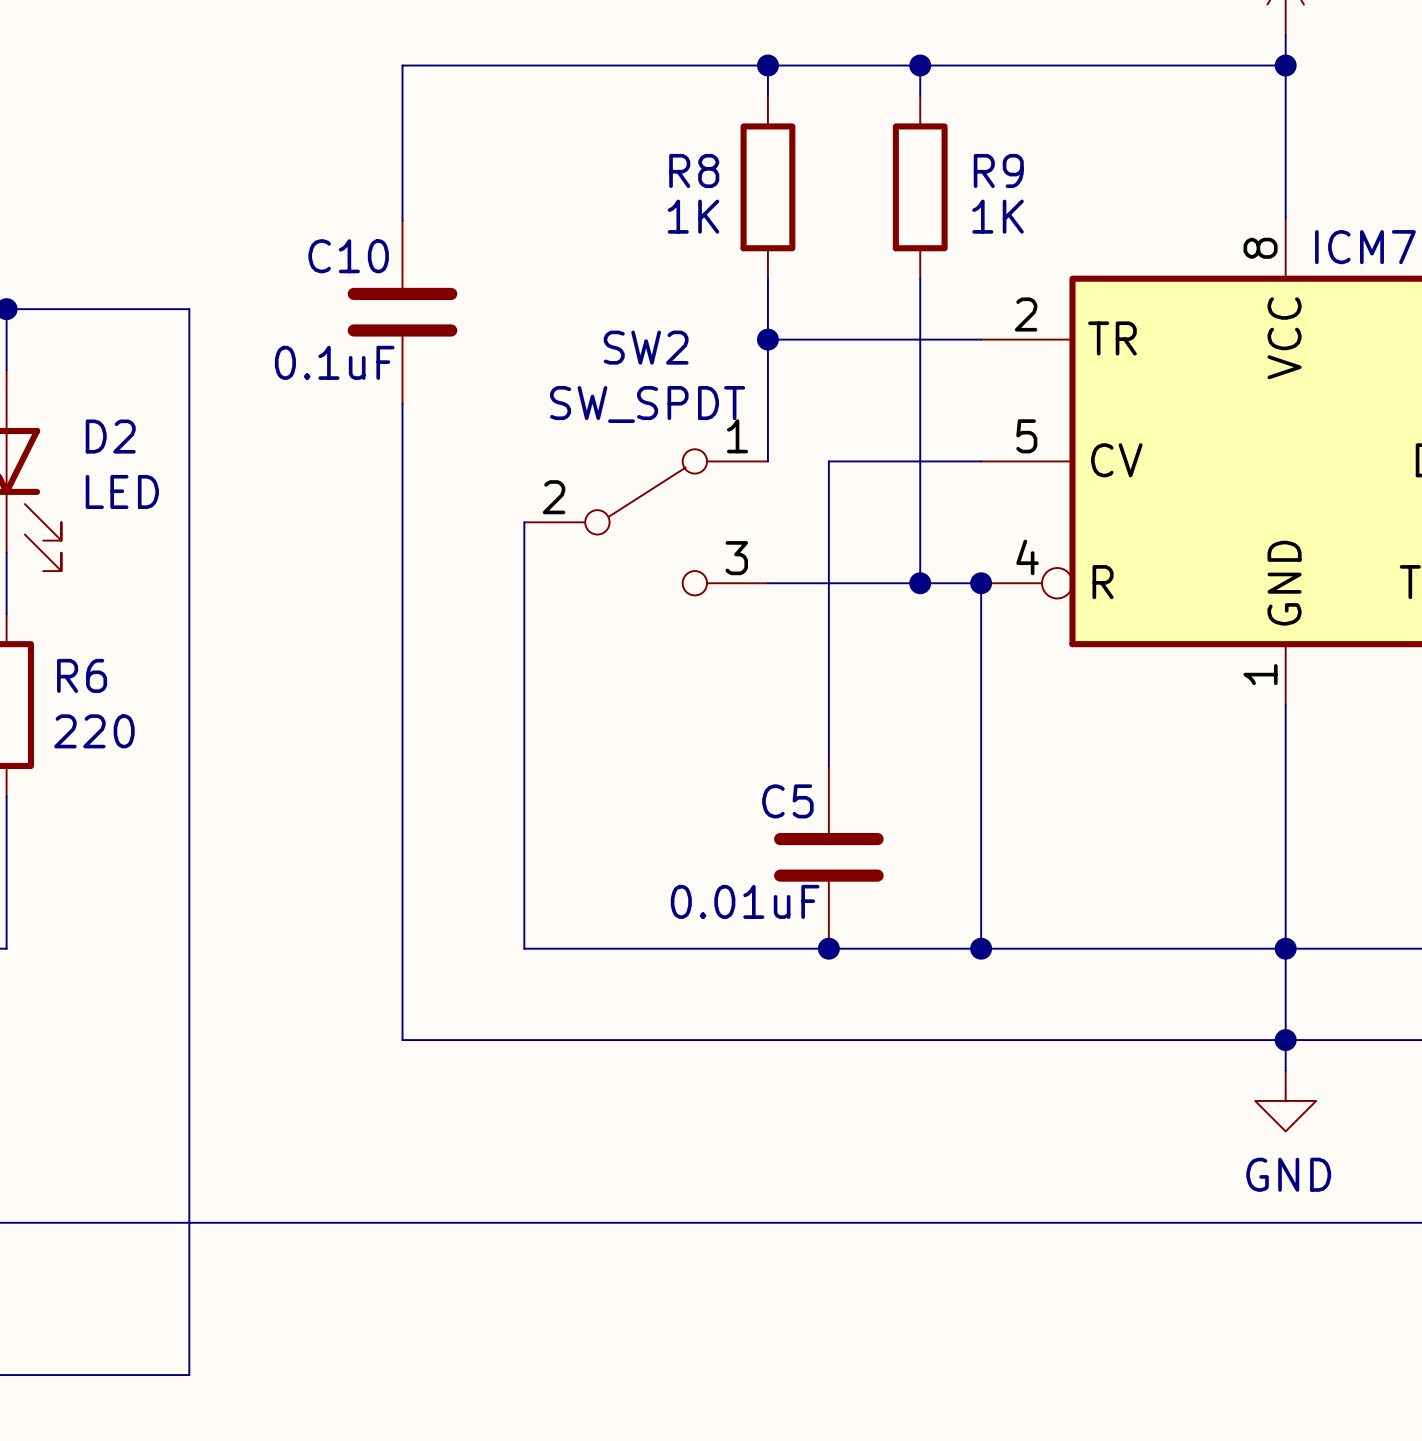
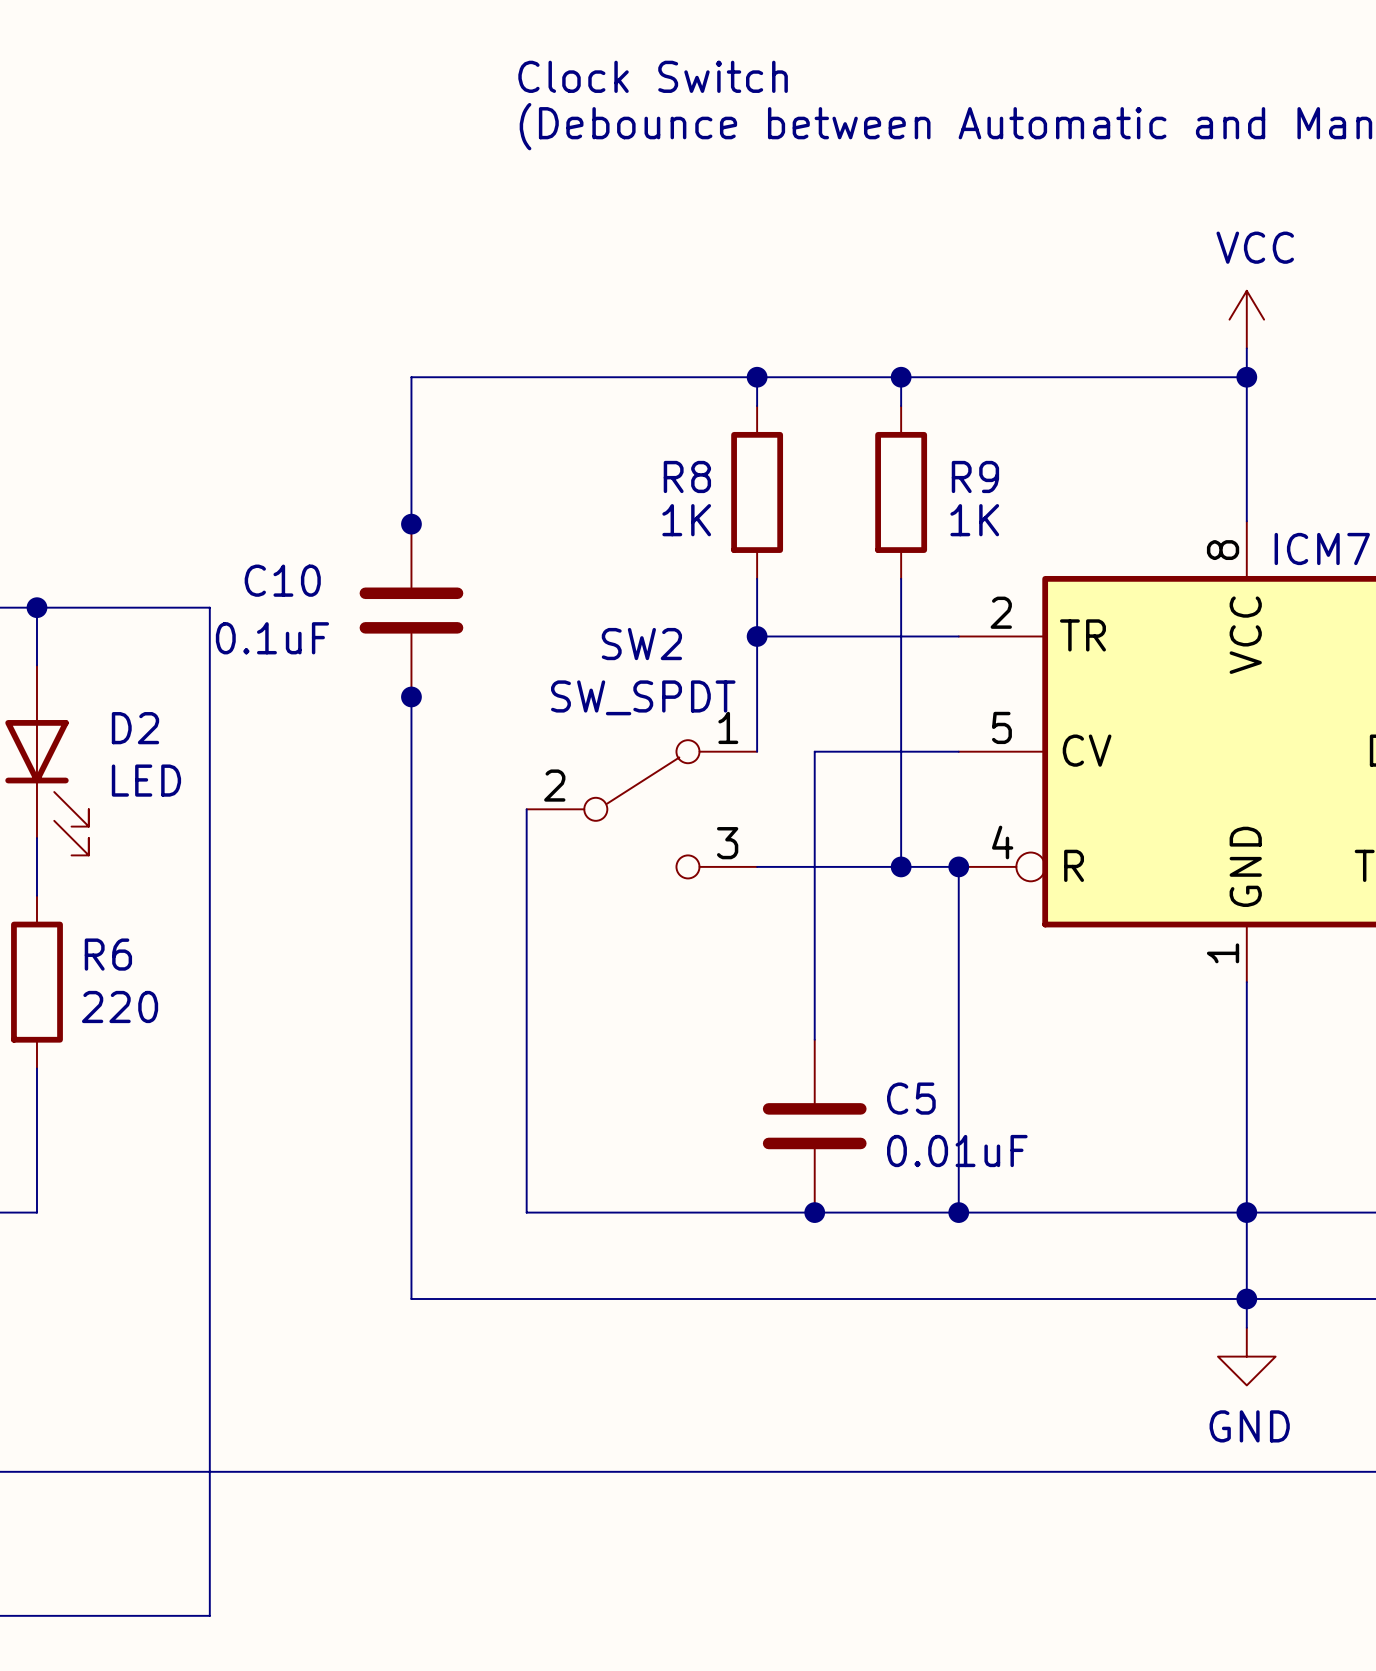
junction: none -> (411, 524)
C10 name position: C10 (348, 256) -> C10 (282, 580)
C10 value position: 0.1uF (334, 362) -> 0.1uF (272, 638)
junction: none -> (411, 696)
C5 name position: C5 (787, 801) -> C5 (911, 1098)
C5 value position: 0.01uF (745, 901) -> 0.01uF (957, 1151)

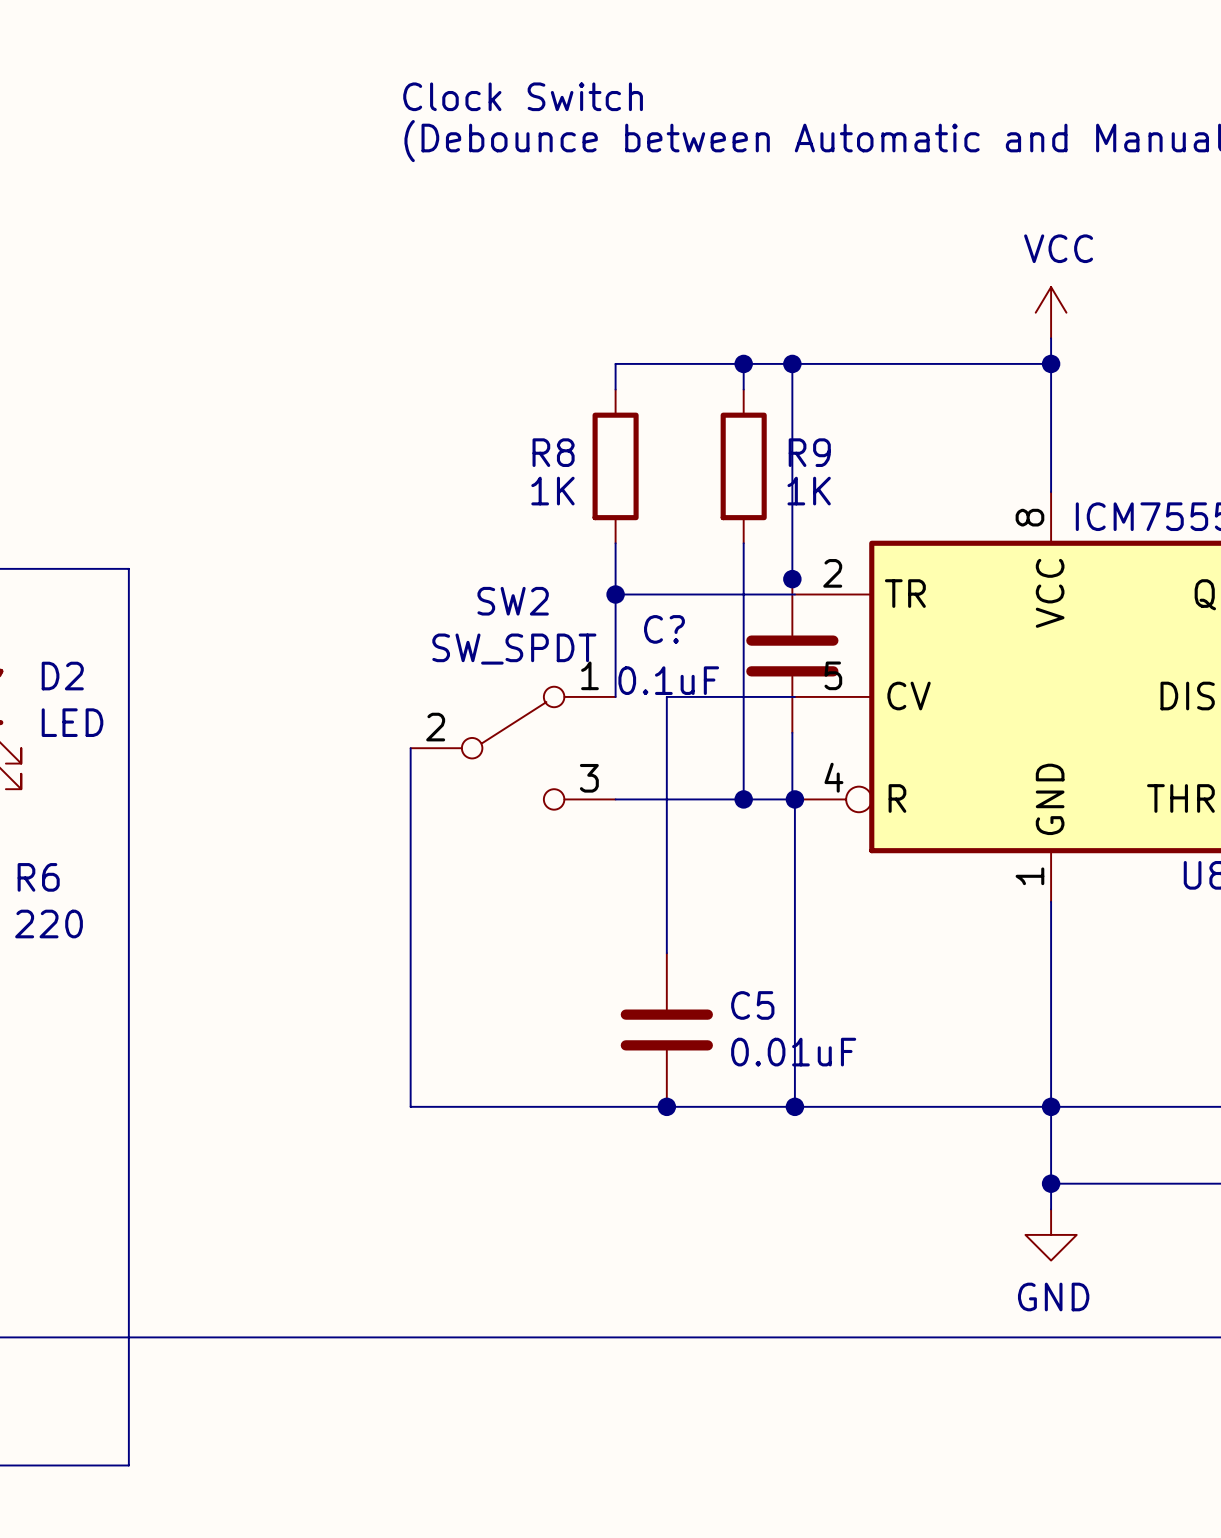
wire: (757, 377) (411, 377) (411, 524) -> none
junction: (757, 377) -> none
wire: none -> (792, 363) (792, 581)
junction: none -> (792, 363)
junction: (411, 524) -> none
C10: 0.1uF (411, 610) -> none
junction: none -> (792, 579)
wire: (411, 696) (411, 1299) (1246, 1299) -> none
junction: (411, 696) -> none
C?: none -> 0.1uF (792, 655)
wire: none -> (792, 732) (792, 799)

